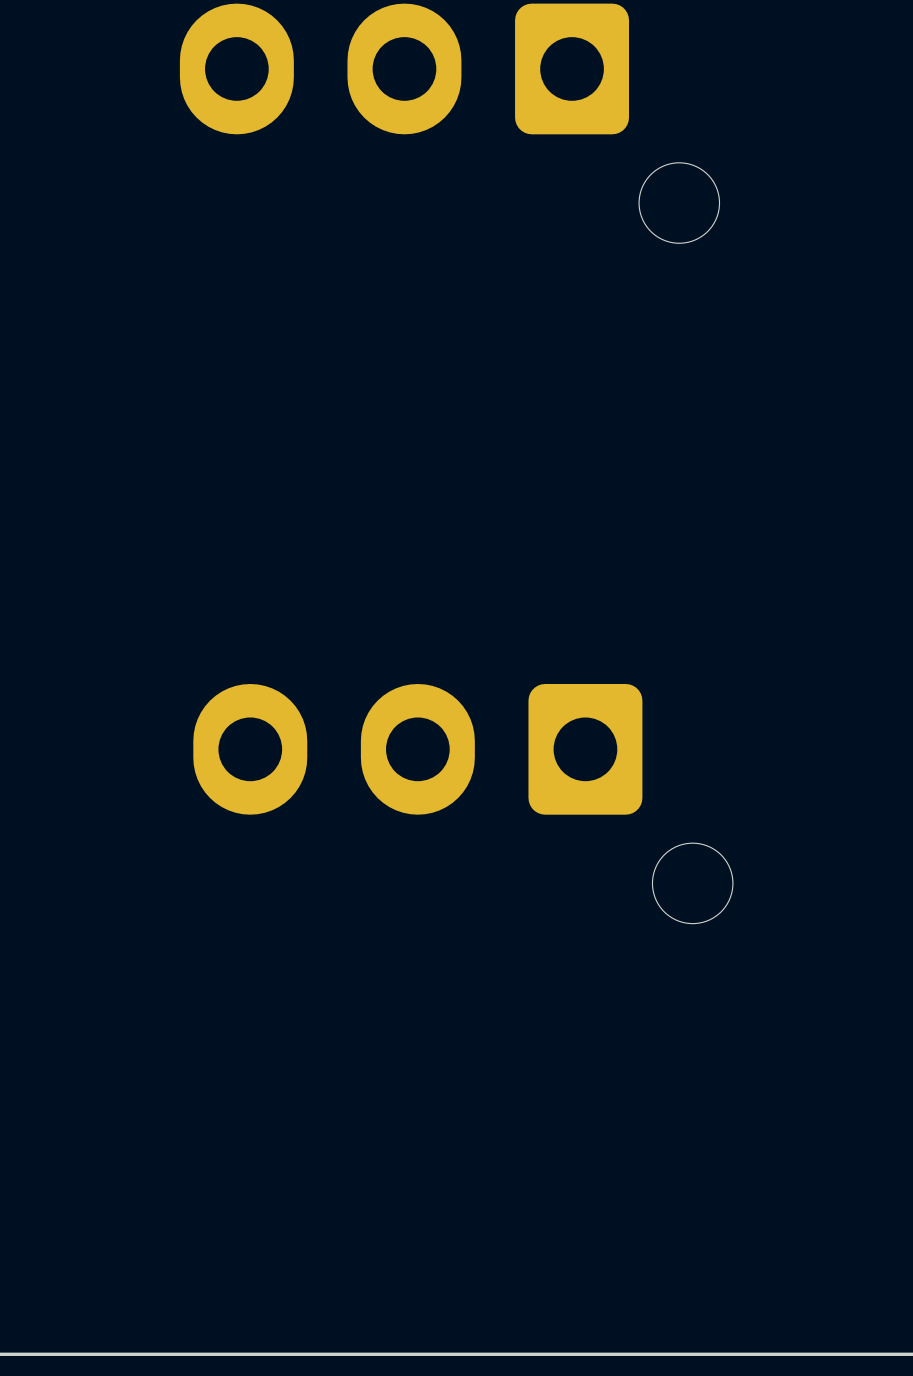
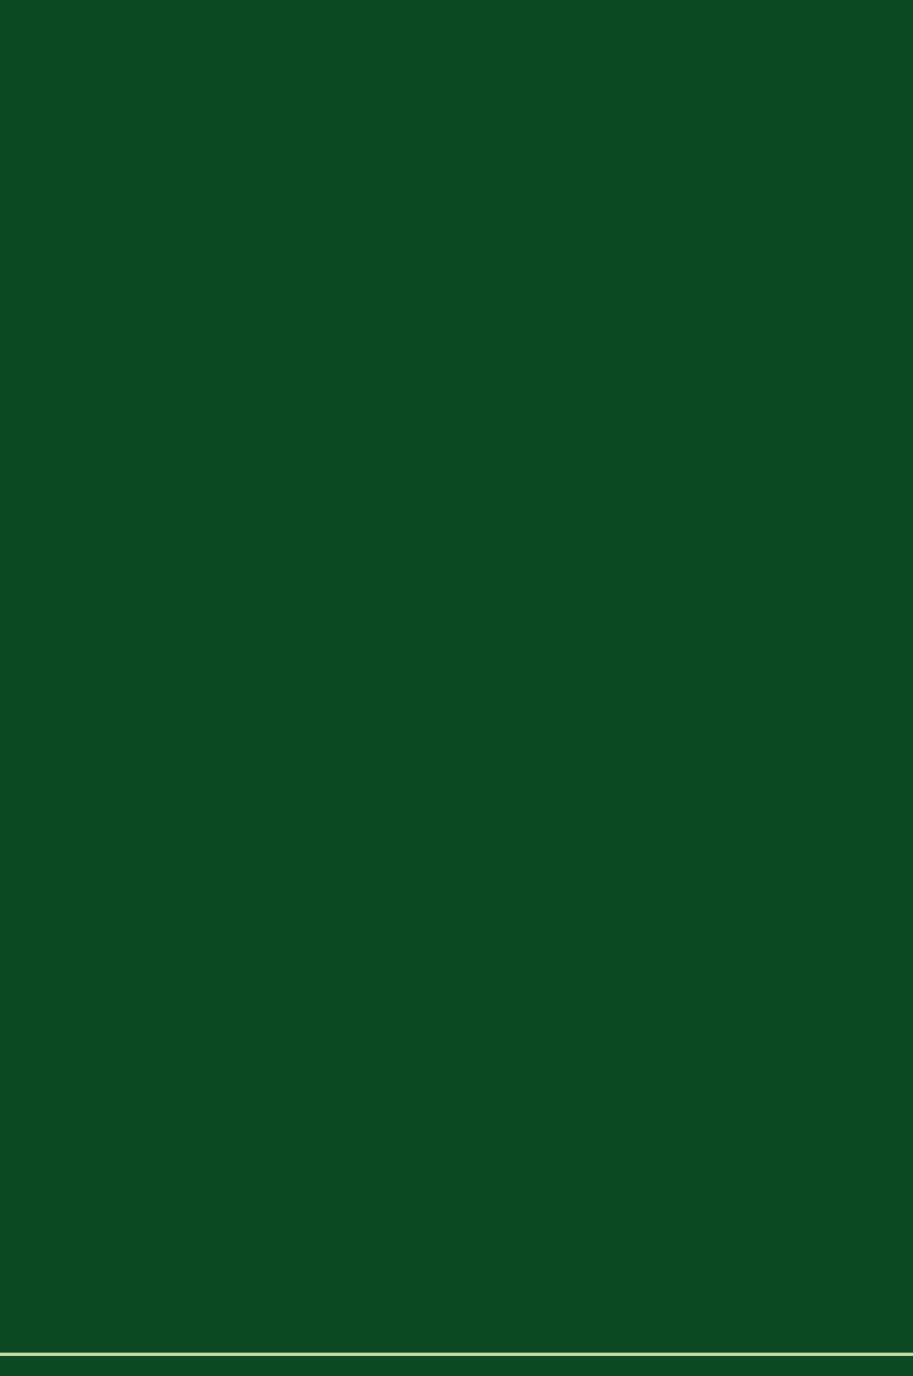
part: (449, 123) -> none
part: (463, 803) -> none

